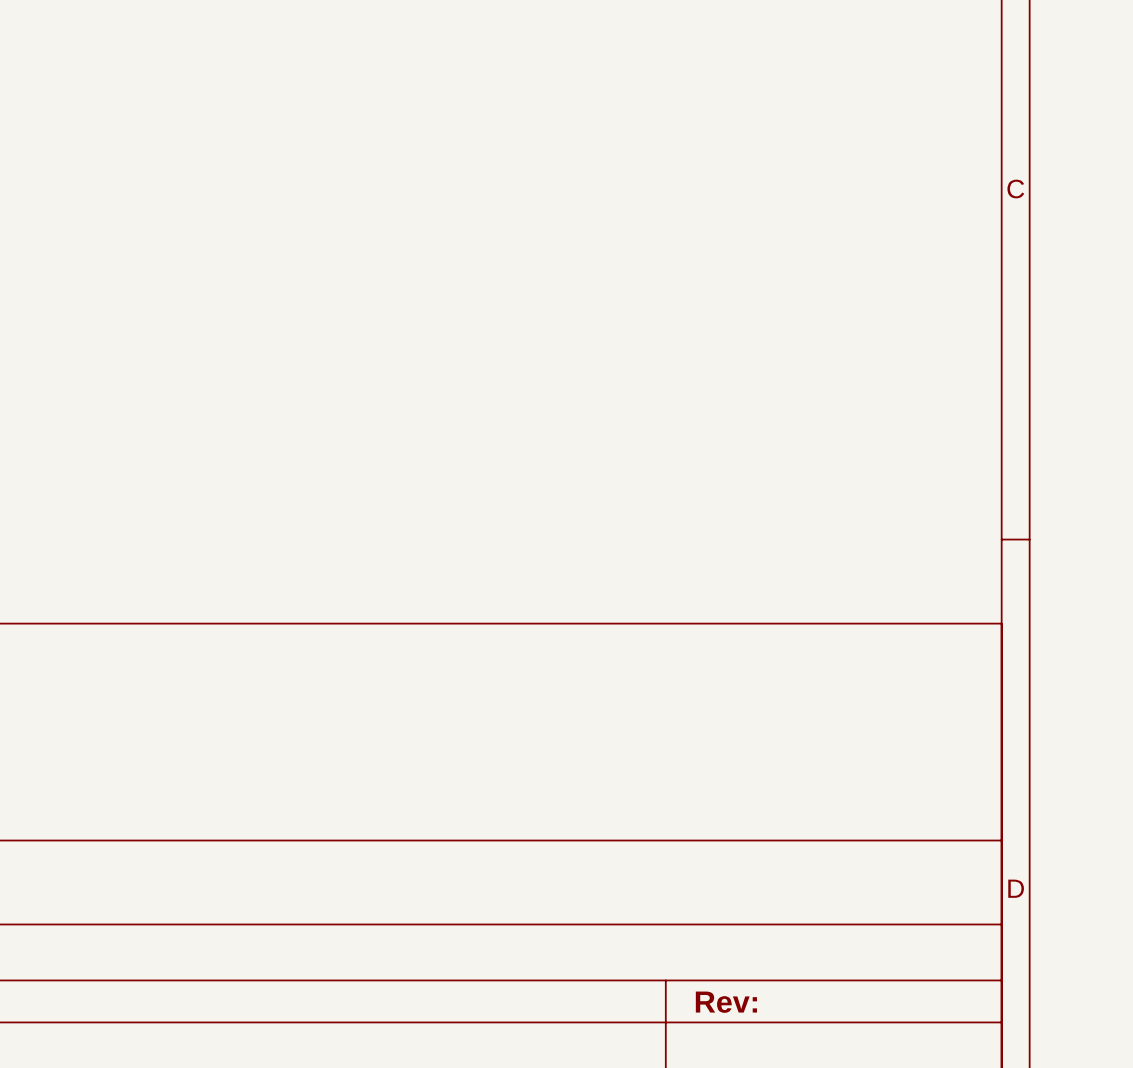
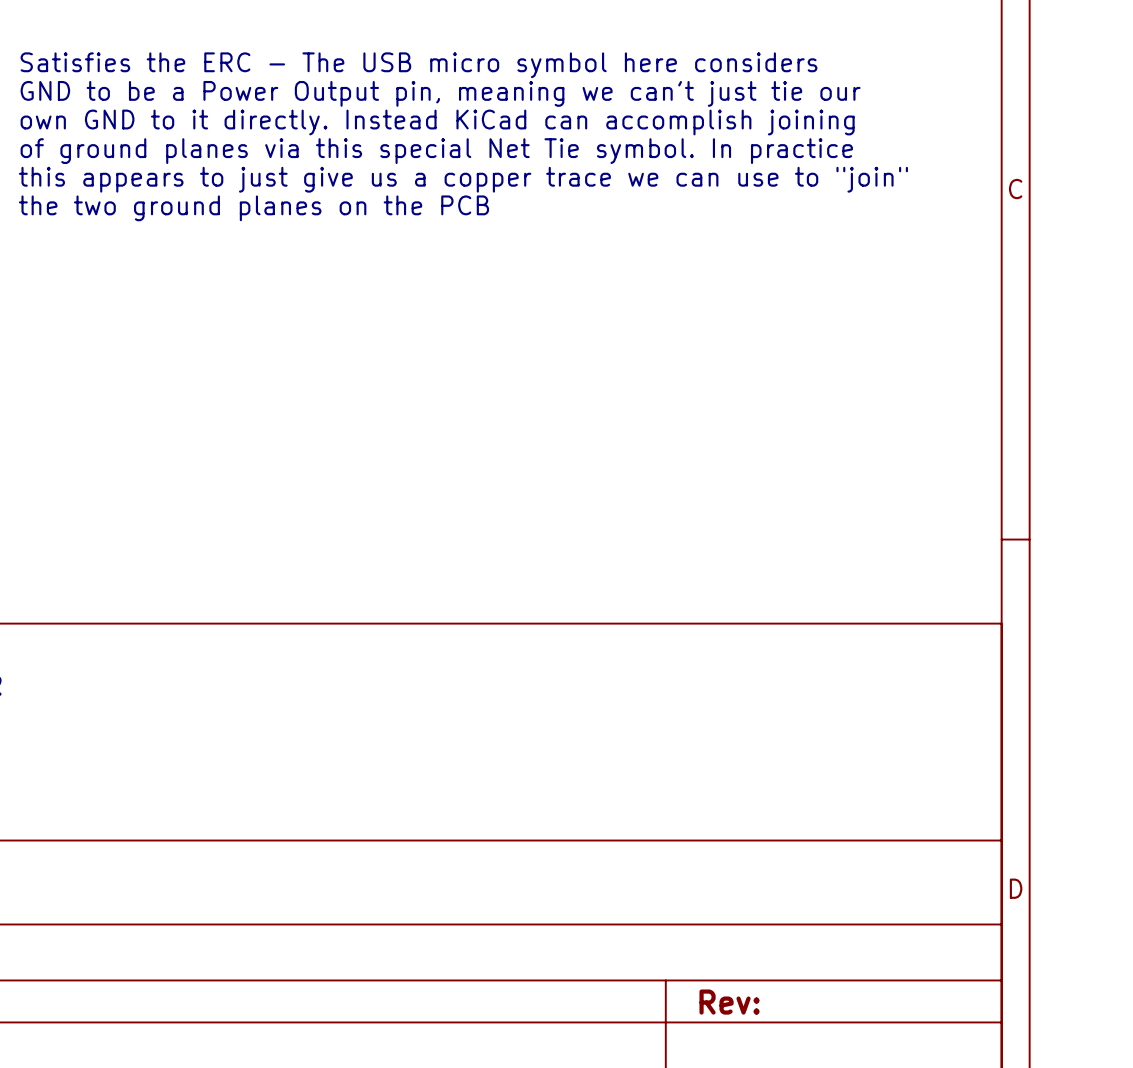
text: none -> Satisfies the ERC - The USB micro symbol here considers (419, 65)
text: none -> GND to be a Power Output pin, meaning we can't just tie our (440, 93)
text: none -> own GND to it directly. Instead KiCad can accomplish joining (437, 122)
text: none -> of ground planes via this special Net Tie symbol. In practice (436, 151)
text: none -> this appears to just give us a copper trace we can use to "join" (463, 179)
text: none -> the two ground planes on the PCB (253, 208)

